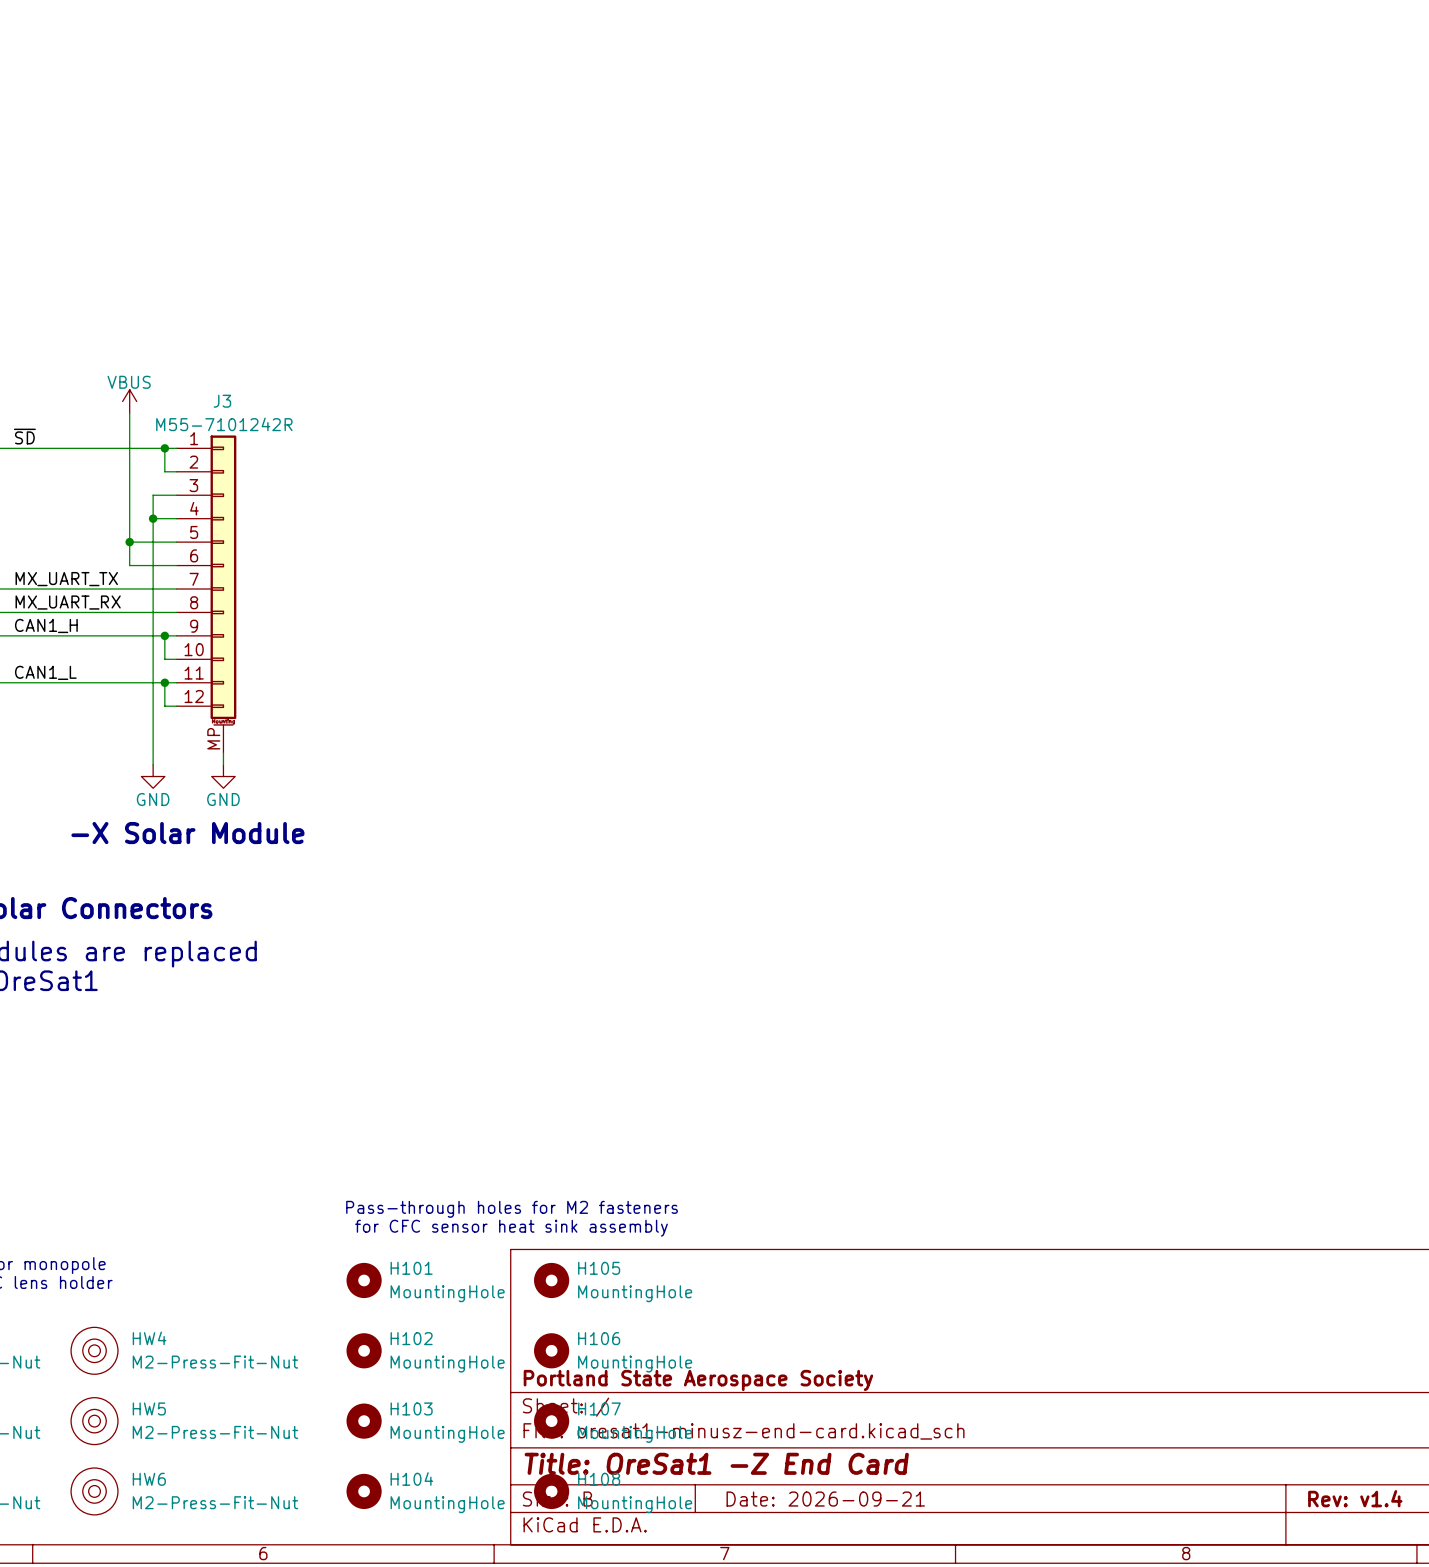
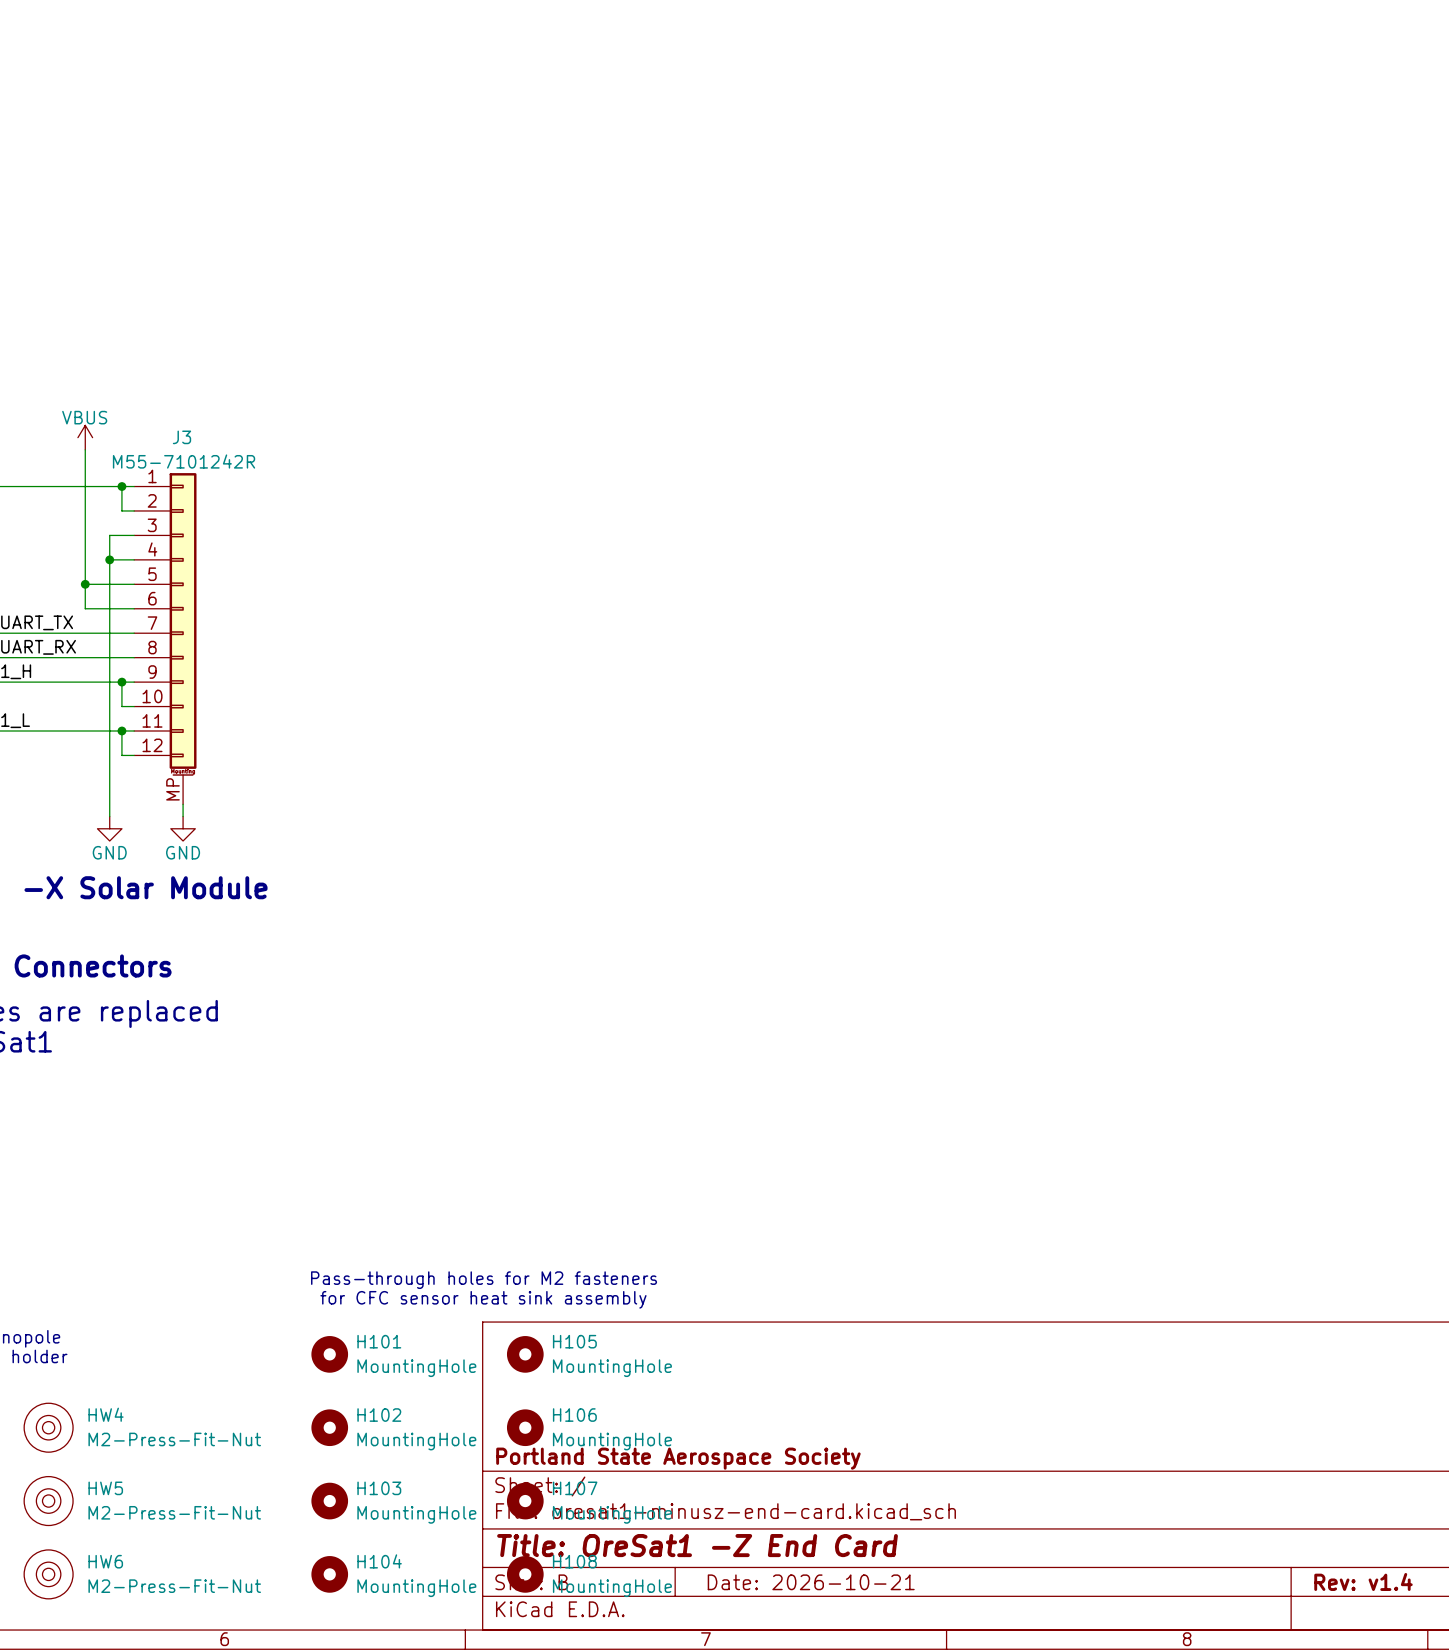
title block: Date: 2026-09-21 (825, 1499) -> Date: 2026-10-21 (811, 1582)

